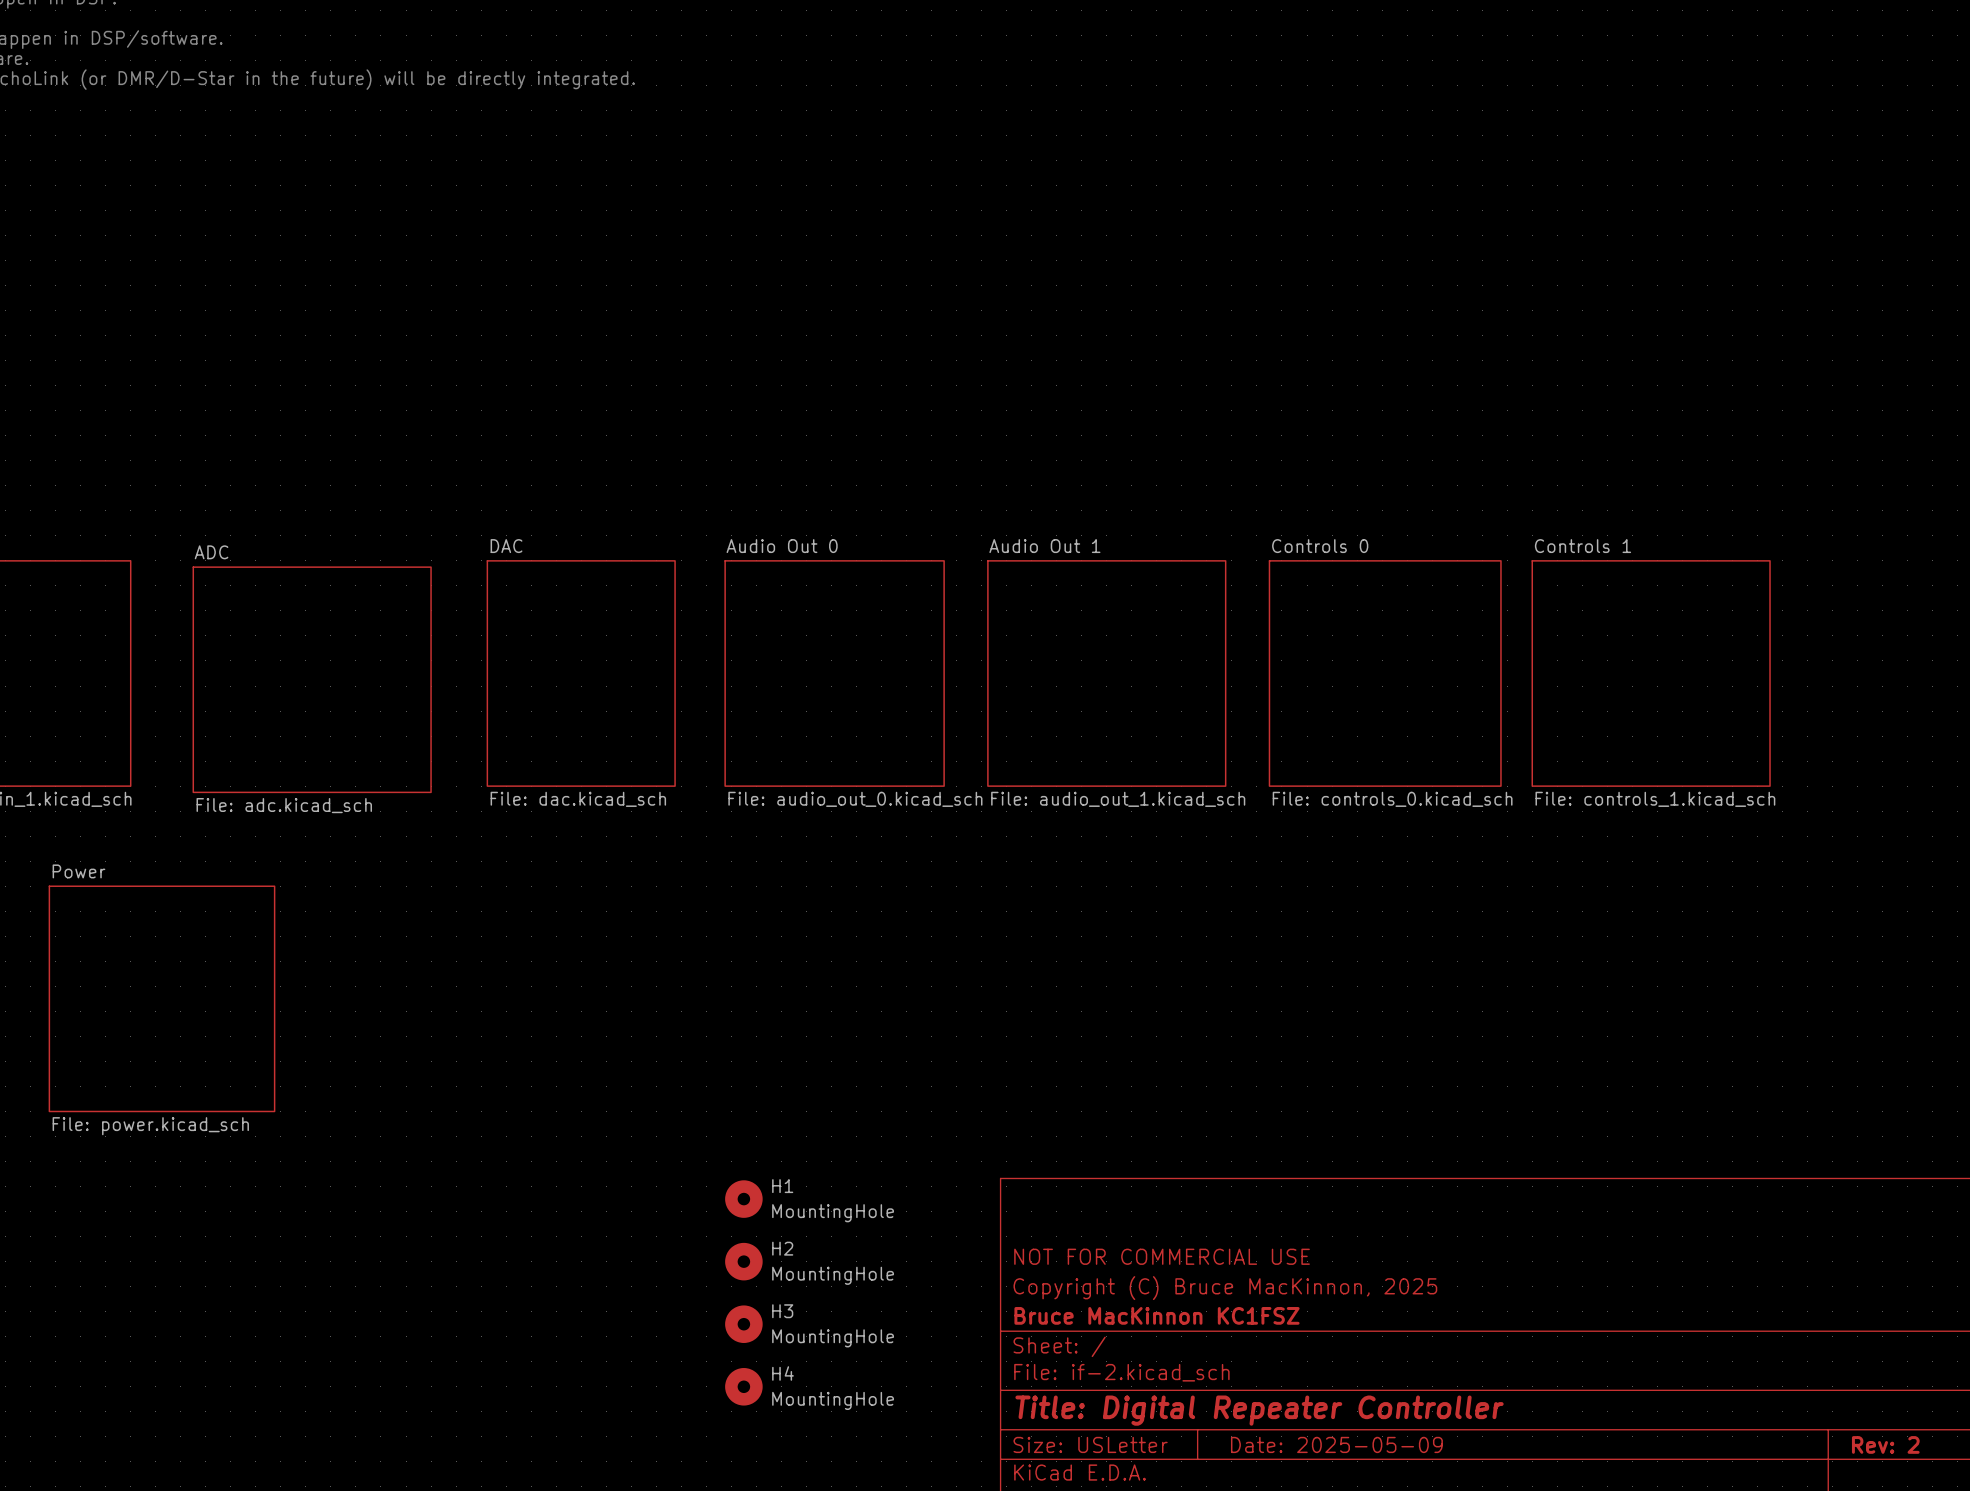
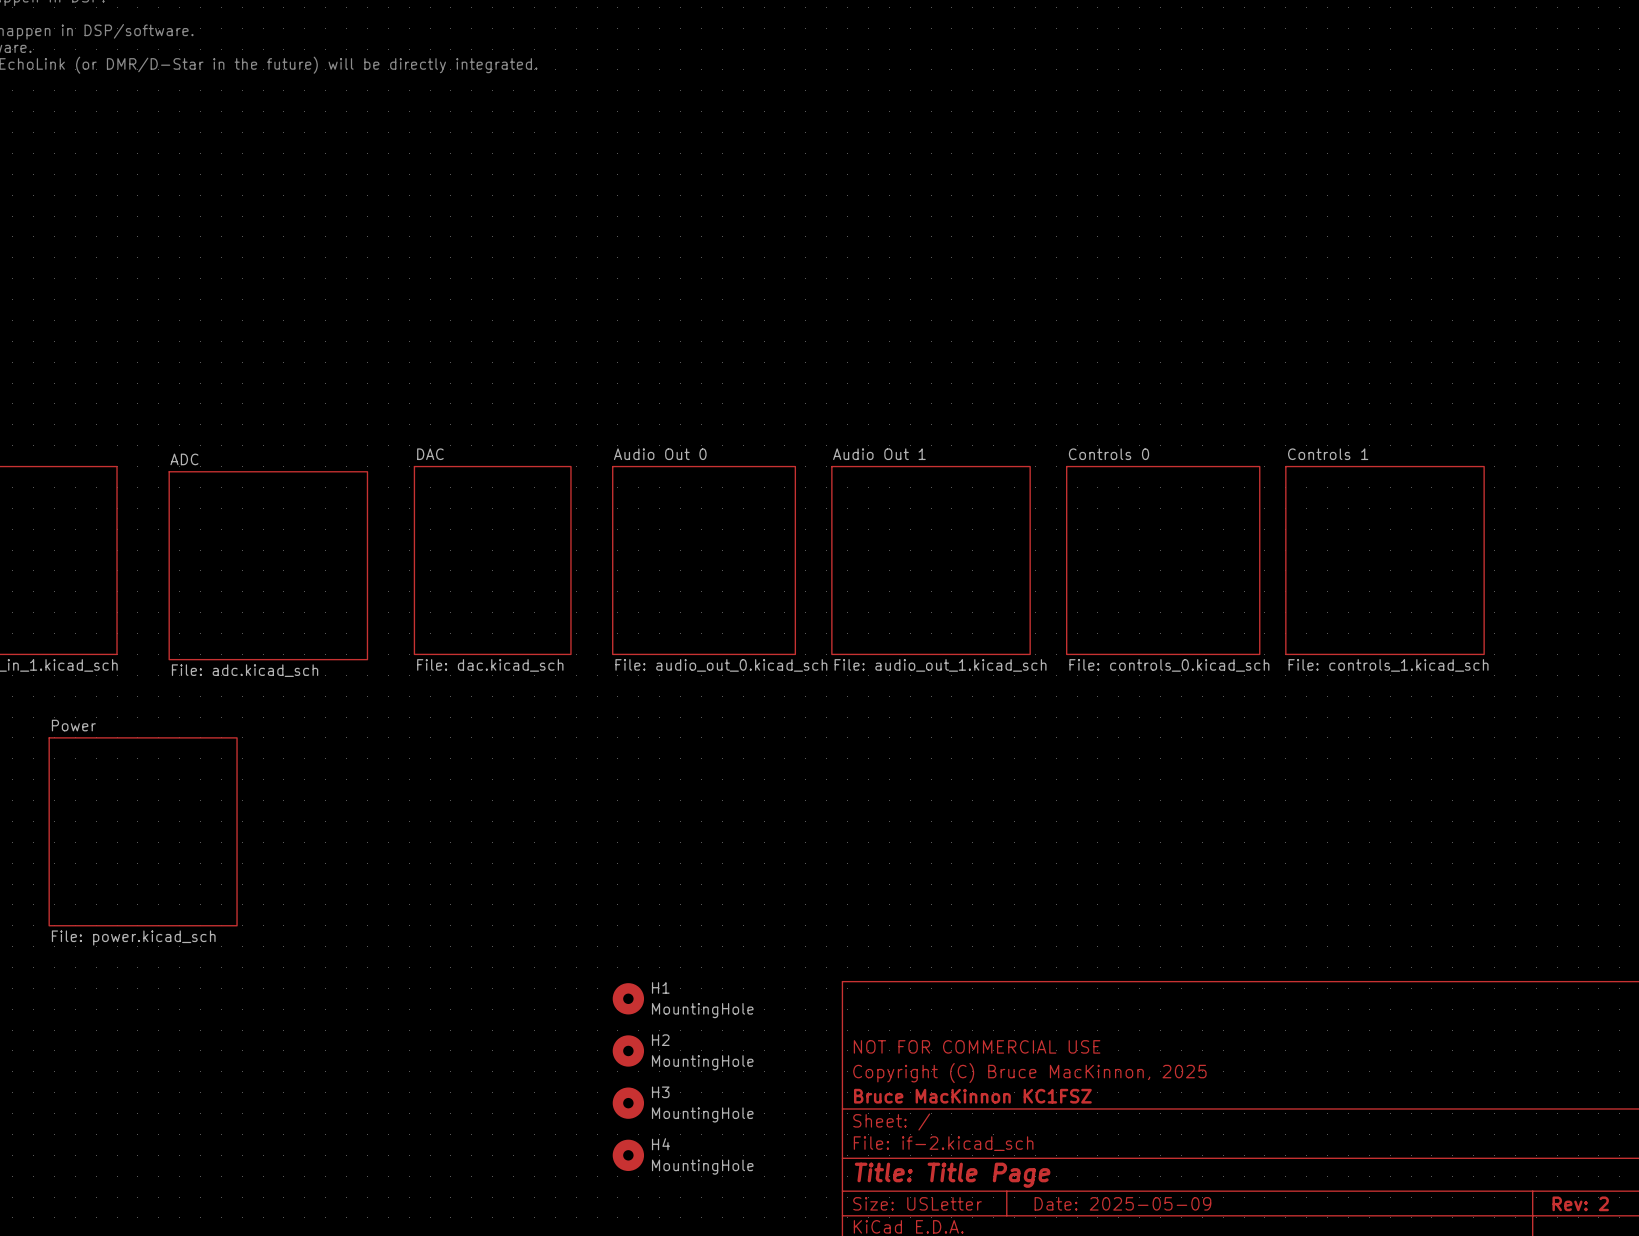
title block: Title: Digital Repeater Controller (1259, 1410) -> Title: Title Page (952, 1175)

